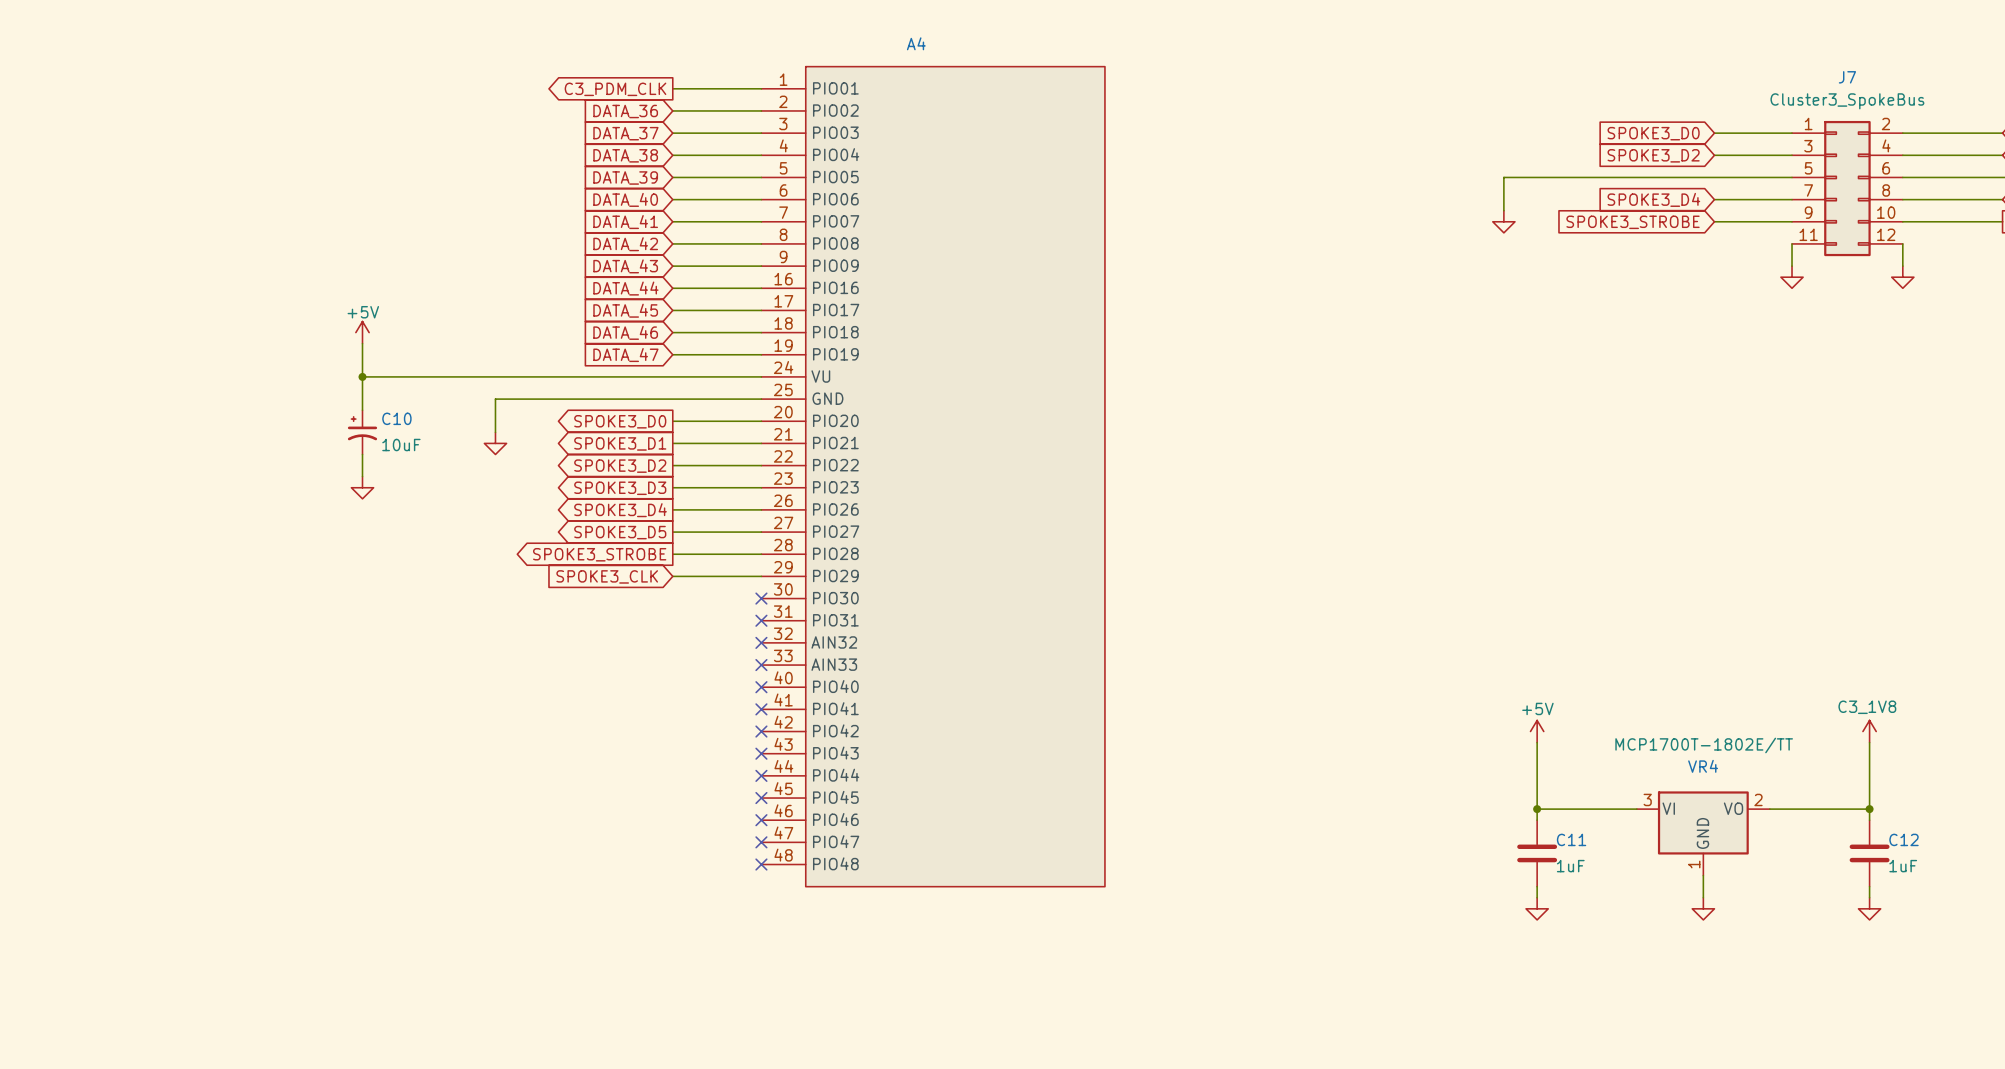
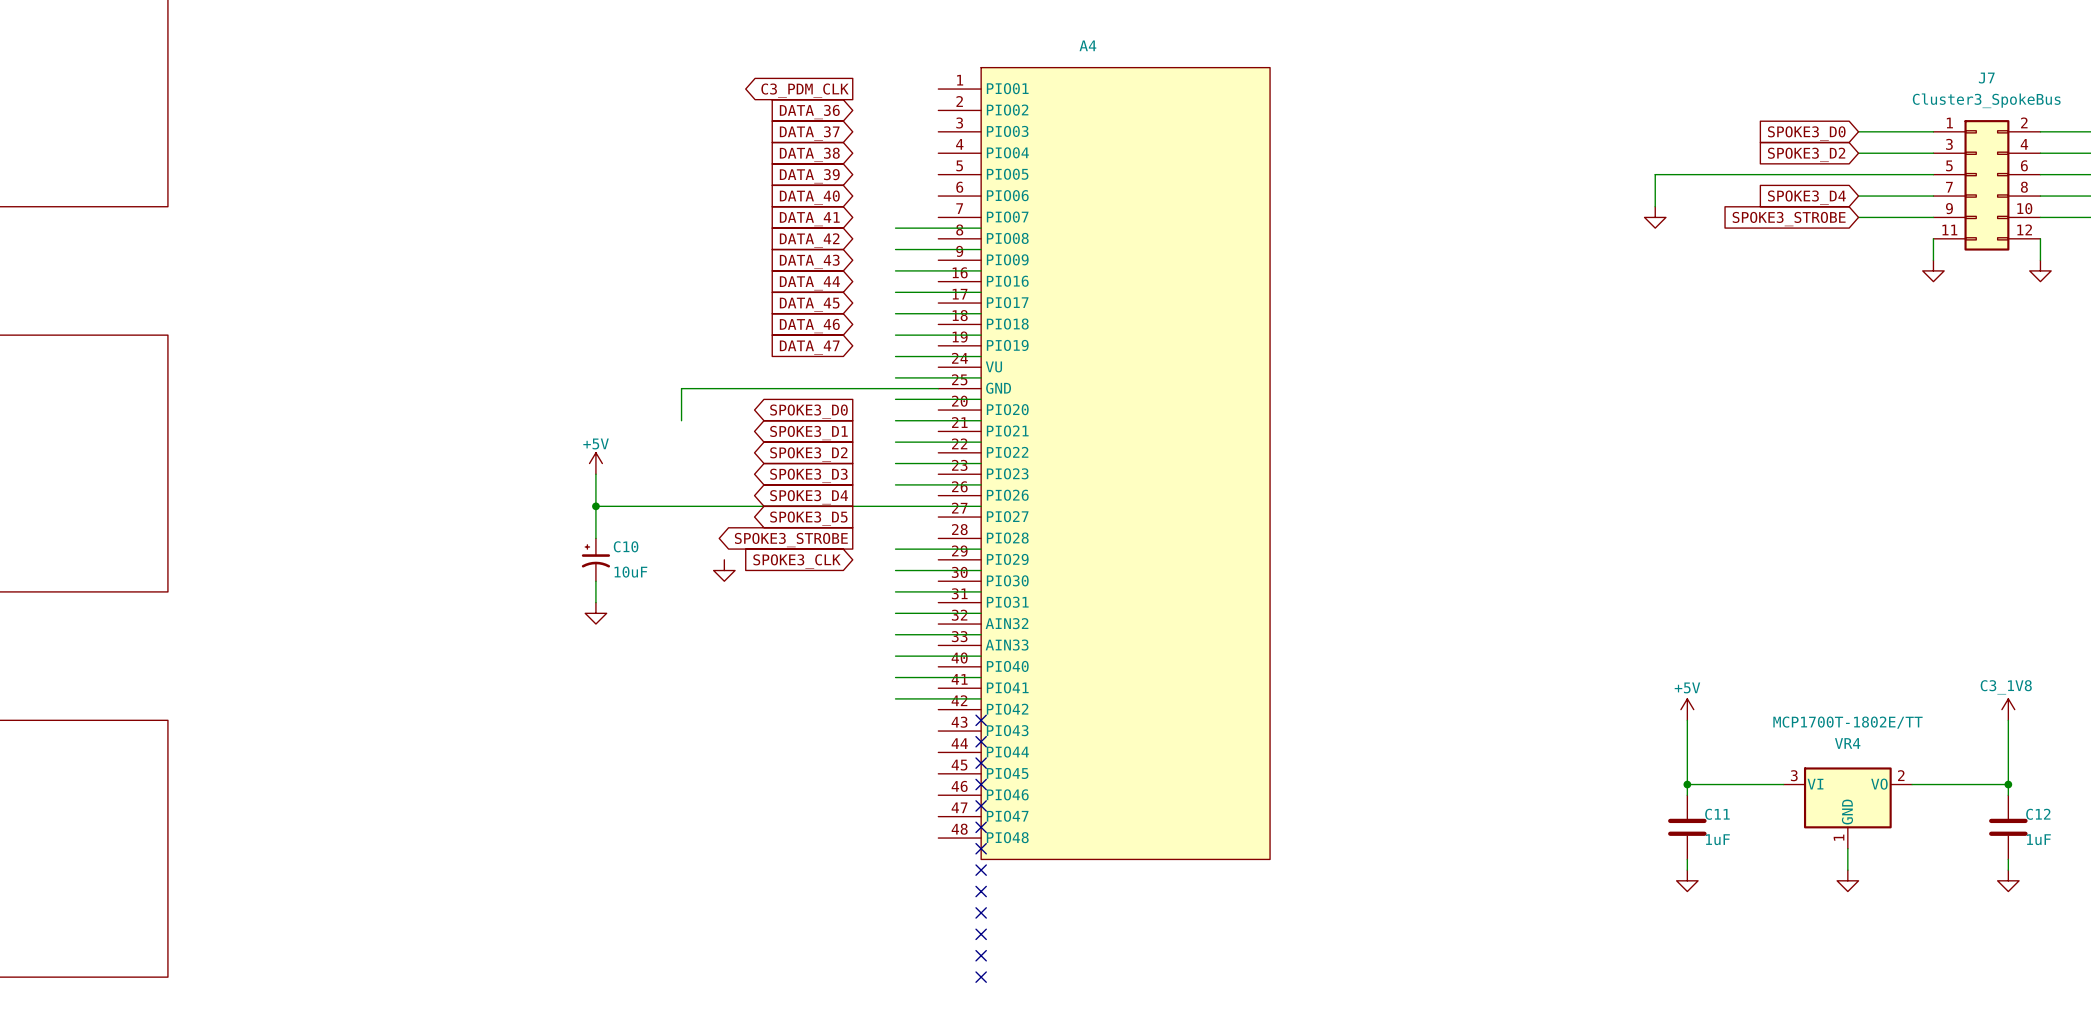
wire: (672, 88) (761, 88) -> (895, 228) (981, 228)
wire: (672, 110) (761, 110) -> (895, 249) (981, 249)
wire: (672, 133) (761, 133) -> (895, 270) (981, 270)
wire: (672, 155) (761, 155) -> (895, 292) (981, 292)
wire: (672, 177) (761, 177) -> (895, 313) (981, 313)
wire: (672, 199) (761, 199) -> (895, 335) (981, 335)
wire: (672, 221) (761, 221) -> (895, 356) (981, 356)
wire: (672, 243) (761, 243) -> (895, 377) (981, 377)
wire: (672, 266) (761, 266) -> (895, 399) (981, 399)
wire: (672, 288) (761, 288) -> (895, 420) (981, 420)
wire: (672, 310) (761, 310) -> (895, 442) (981, 442)
power symbol position: +5V (362, 332) -> +5V (595, 463)
wire: (672, 332) (761, 332) -> (895, 463) (981, 463)
wire: (362, 343) (362, 410) -> (595, 474) (595, 538)
wire: (672, 354) (761, 354) -> (895, 484) (981, 484)
wire: (362, 376) (761, 376) -> (595, 506) (981, 506)
junction: (362, 376) -> none
wire: (672, 421) (761, 421) -> (895, 549) (981, 549)
C10 position: (362, 432) -> (595, 559)
power symbol: (495, 443) -> none
wire: (672, 443) (761, 443) -> (895, 570) (981, 570)
wire: (362, 454) (362, 476) -> (595, 581) (595, 602)
wire: (672, 465) (761, 465) -> (895, 591) (981, 591)
power symbol: (362, 487) -> none
wire: (672, 487) (761, 487) -> (895, 613) (981, 613)
wire: (672, 509) (761, 509) -> (895, 634) (981, 634)
junction: none -> (595, 506)
wire: (672, 532) (761, 532) -> (895, 656) (981, 656)
wire: (672, 554) (761, 554) -> (895, 677) (981, 677)
wire: (672, 576) (761, 576) -> (895, 698) (981, 698)
power symbol: none -> (724, 570)
no-connect mark: (761, 598) -> none
no-connect mark: (761, 620) -> none
power symbol: none -> (595, 613)
no-connect mark: (761, 642) -> none
no-connect mark: (761, 665) -> none
no-connect mark: (761, 687) -> none
no-connect mark: (761, 709) -> none
no-connect mark: (761, 731) -> none
no-connect mark: none -> (981, 720)
no-connect mark: (761, 753) -> none
no-connect mark: none -> (981, 741)
no-connect mark: (761, 775) -> none
no-connect mark: none -> (981, 763)
no-connect mark: (761, 798) -> none
no-connect mark: none -> (981, 784)
no-connect mark: (761, 820) -> none
no-connect mark: none -> (981, 805)
no-connect mark: (761, 842) -> none
no-connect mark: none -> (981, 827)
no-connect mark: (761, 864) -> none
no-connect mark: none -> (981, 848)
no-connect mark: none -> (981, 870)
no-connect mark: none -> (981, 891)
no-connect mark: none -> (981, 912)
no-connect mark: none -> (981, 934)
no-connect mark: none -> (981, 955)
no-connect mark: none -> (981, 977)

